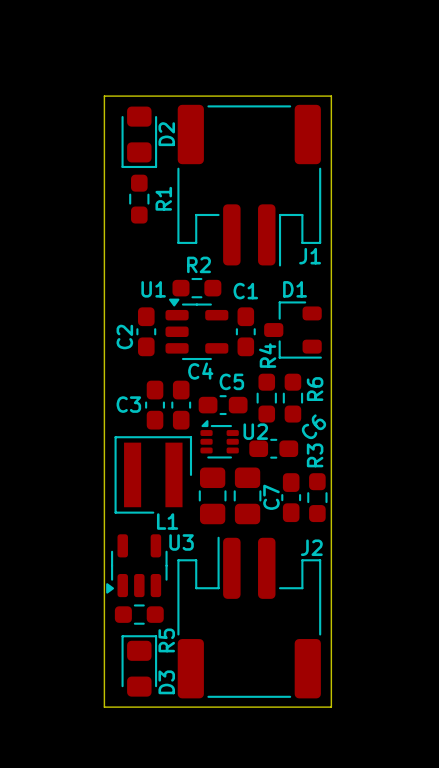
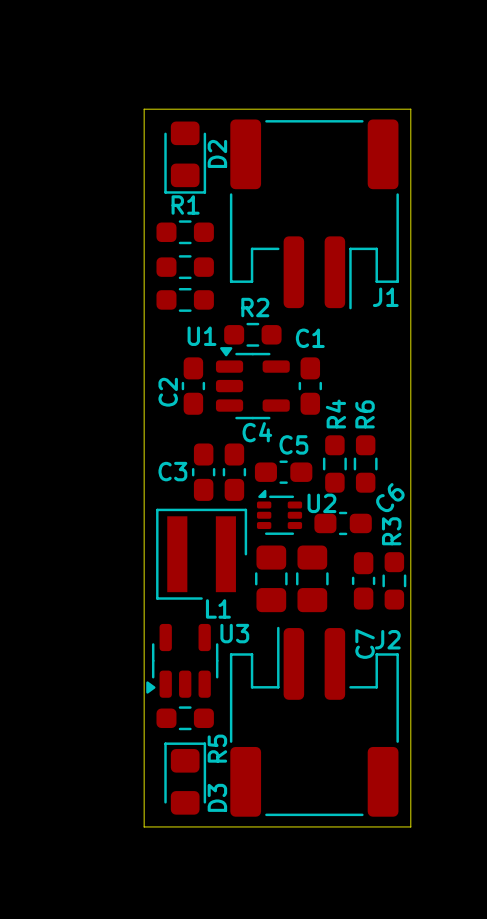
R1 rotation: 0° (139, 199) -> 90° clockwise (185, 232)
part: none -> (185, 267)
part: none -> (185, 299)
D1: (293, 330) -> none
R6 name position: R6 (315, 389) -> R6 (365, 414)
C7 name position: C7 (271, 497) -> C7 (365, 644)

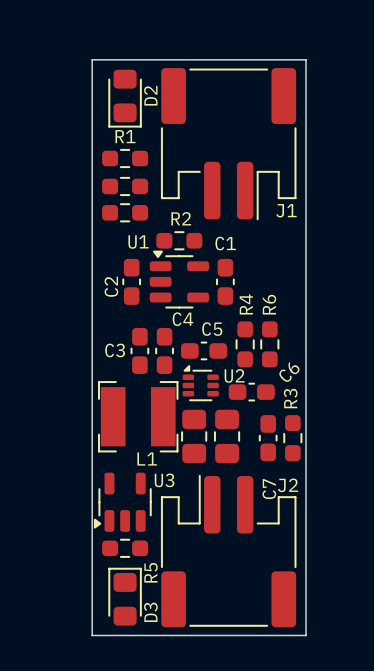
L1 footprint: [156, 508, 248, 600] -> [98, 381, 179, 453]

